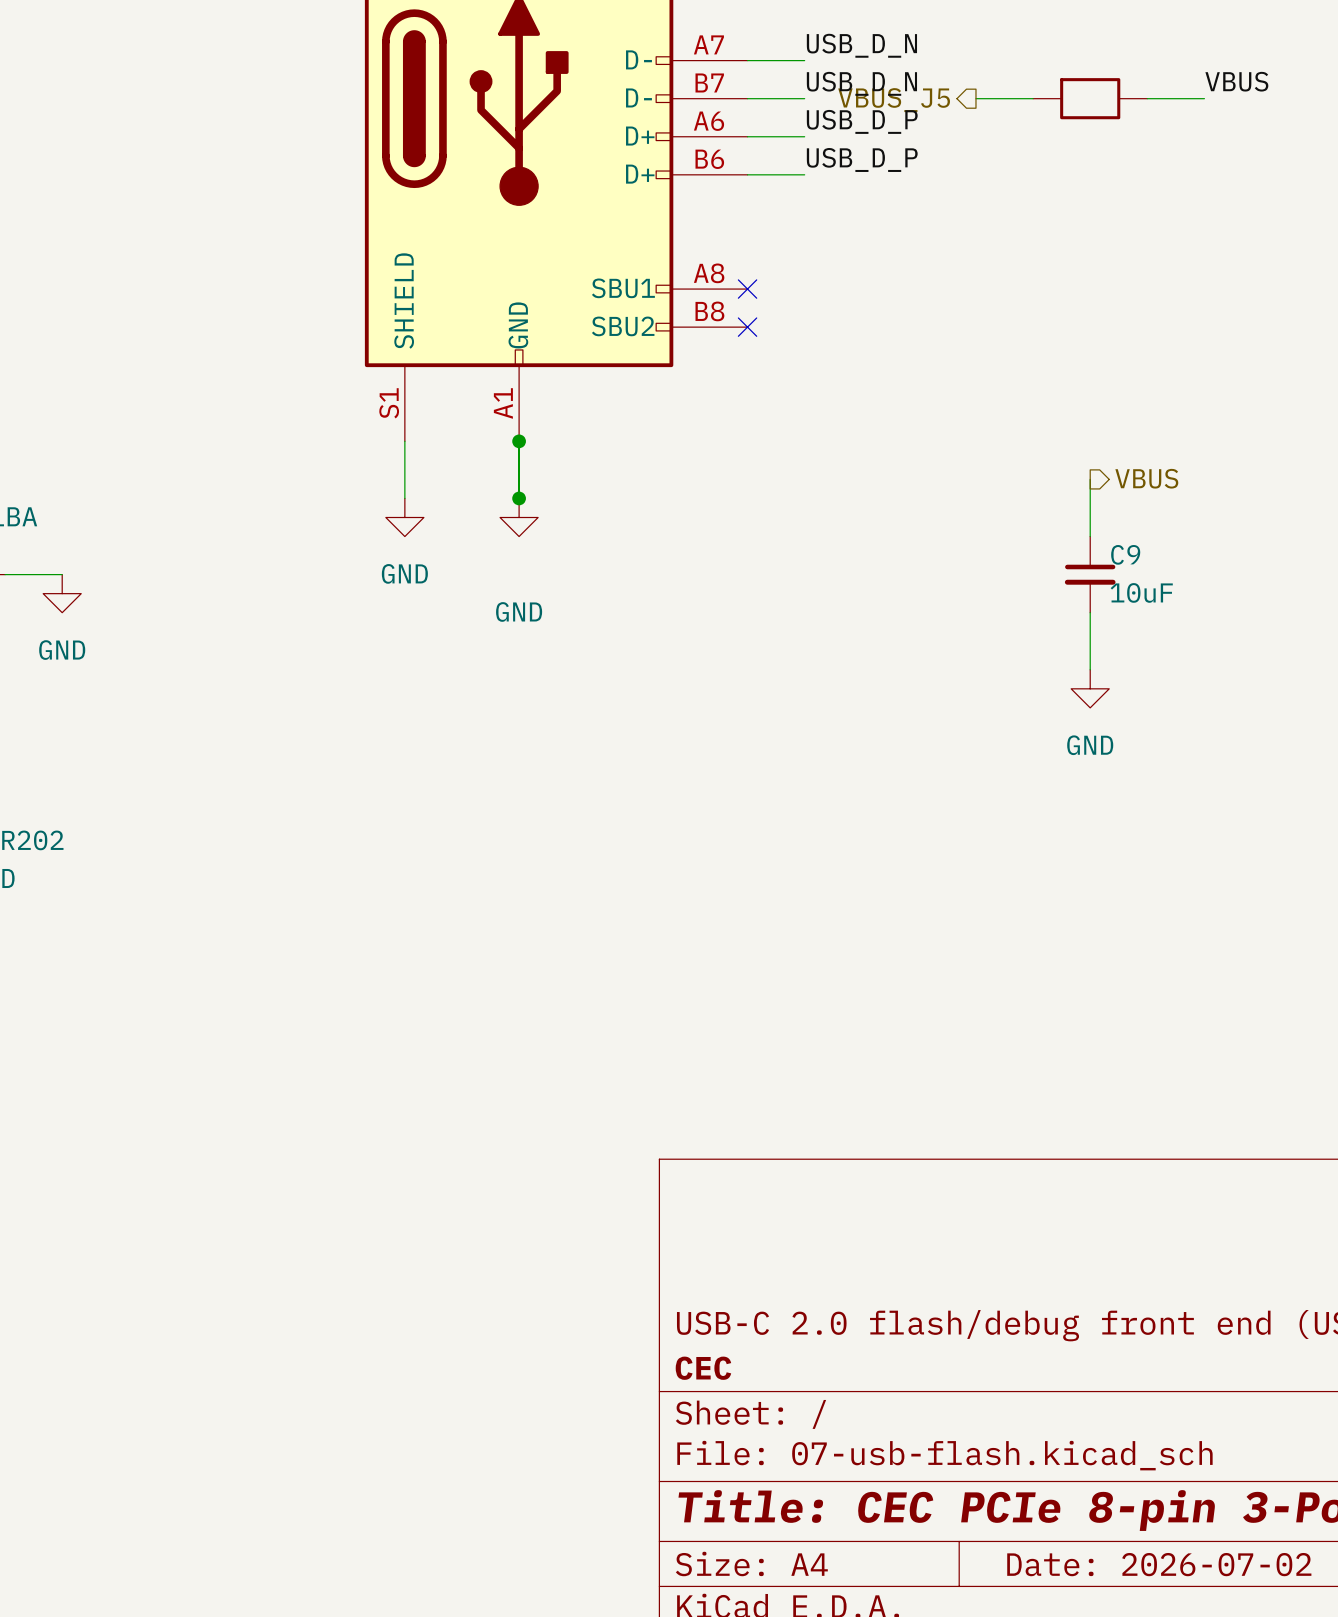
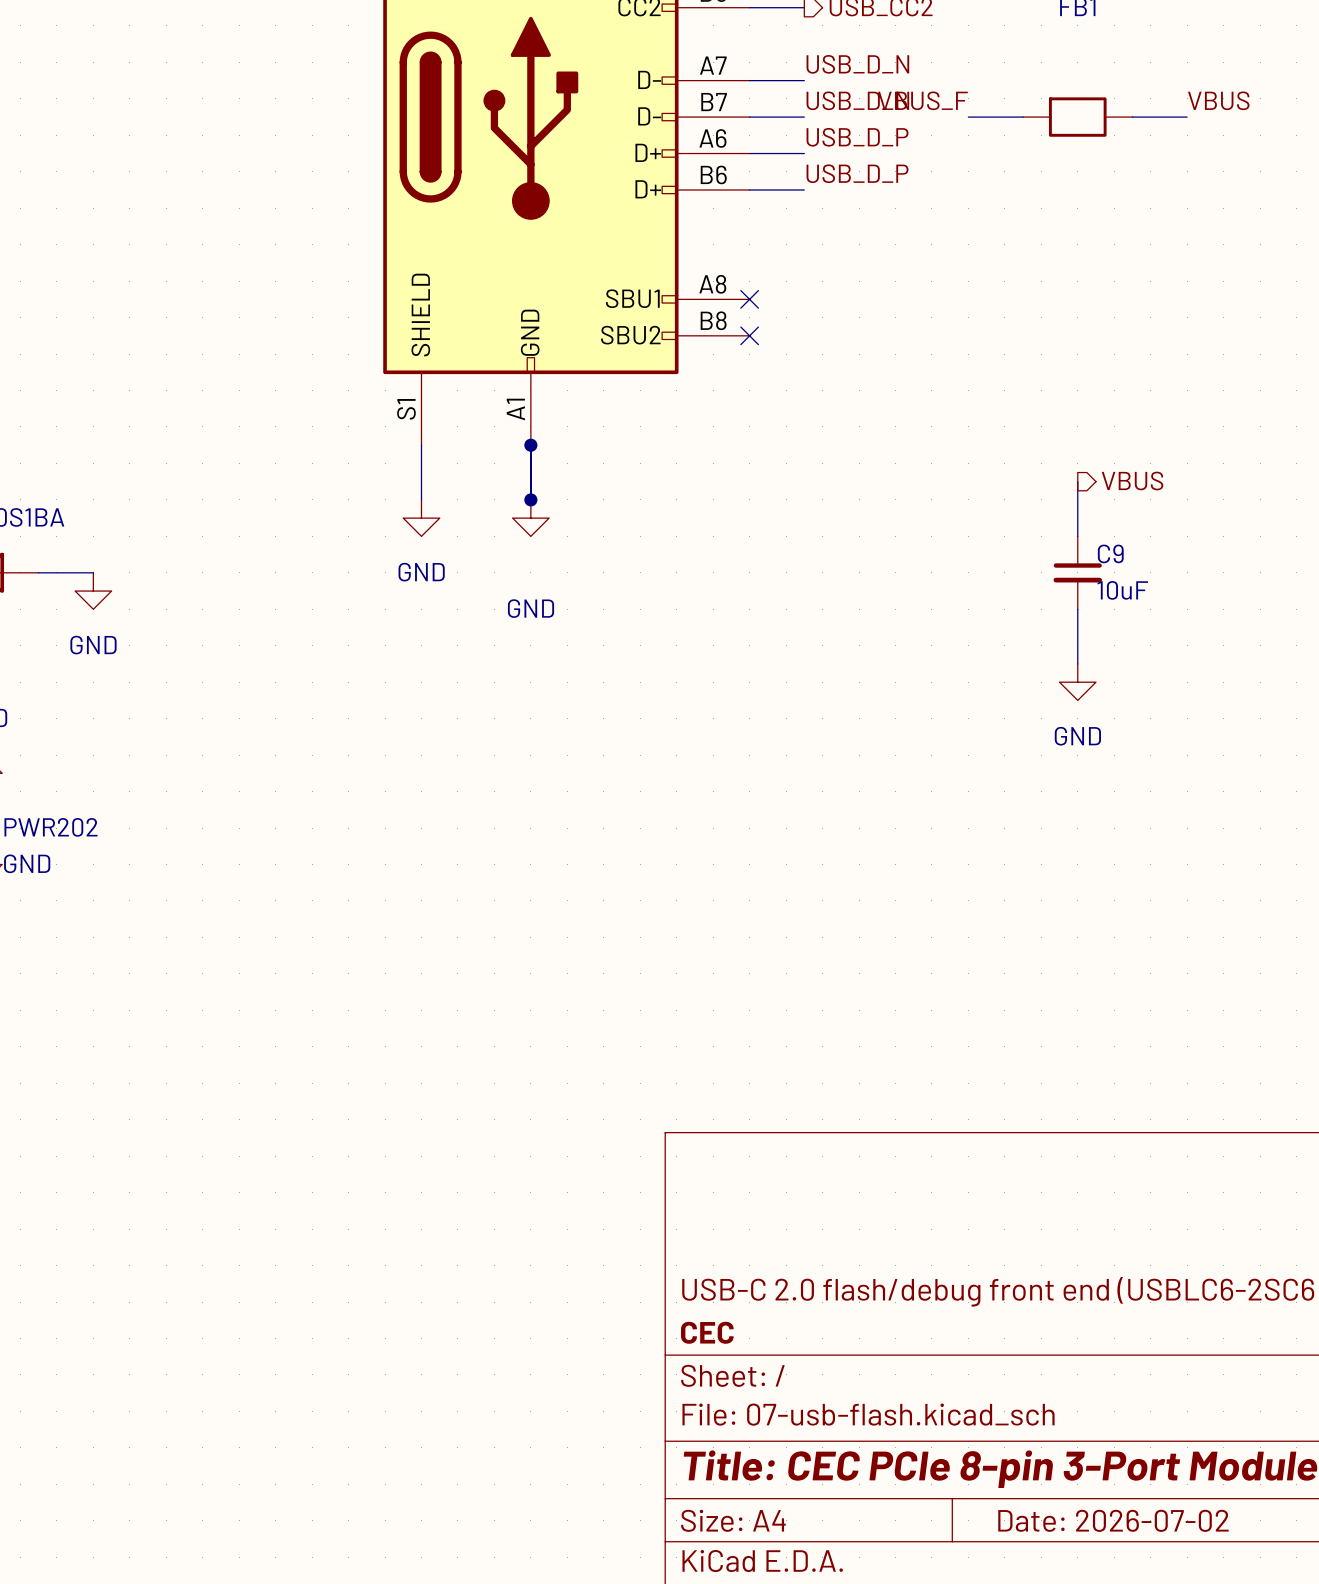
label: none -> VBUS_F (922, 100)
hierarchical label: VBUS_J5 (894, 100) -> none

